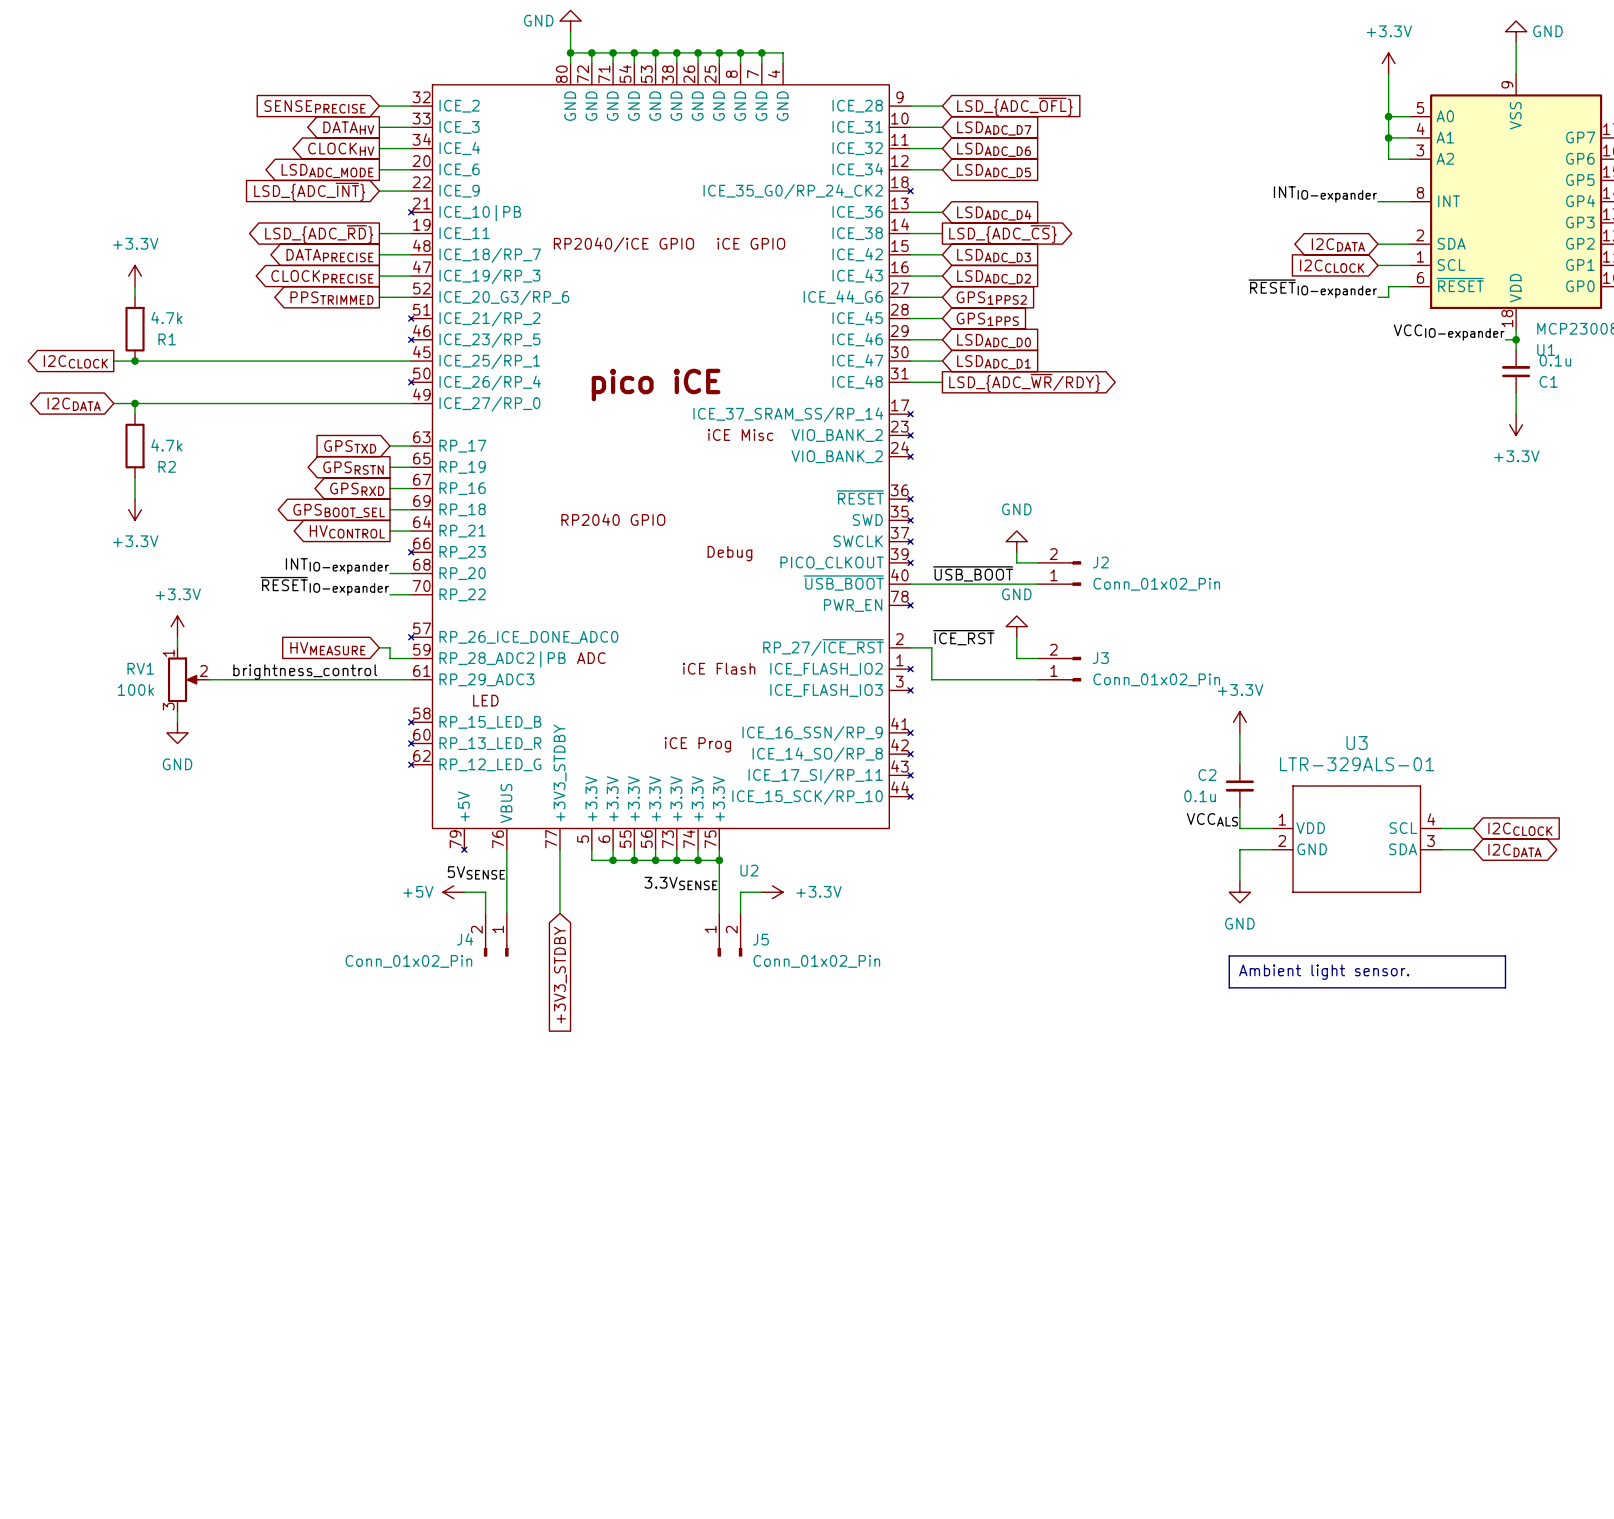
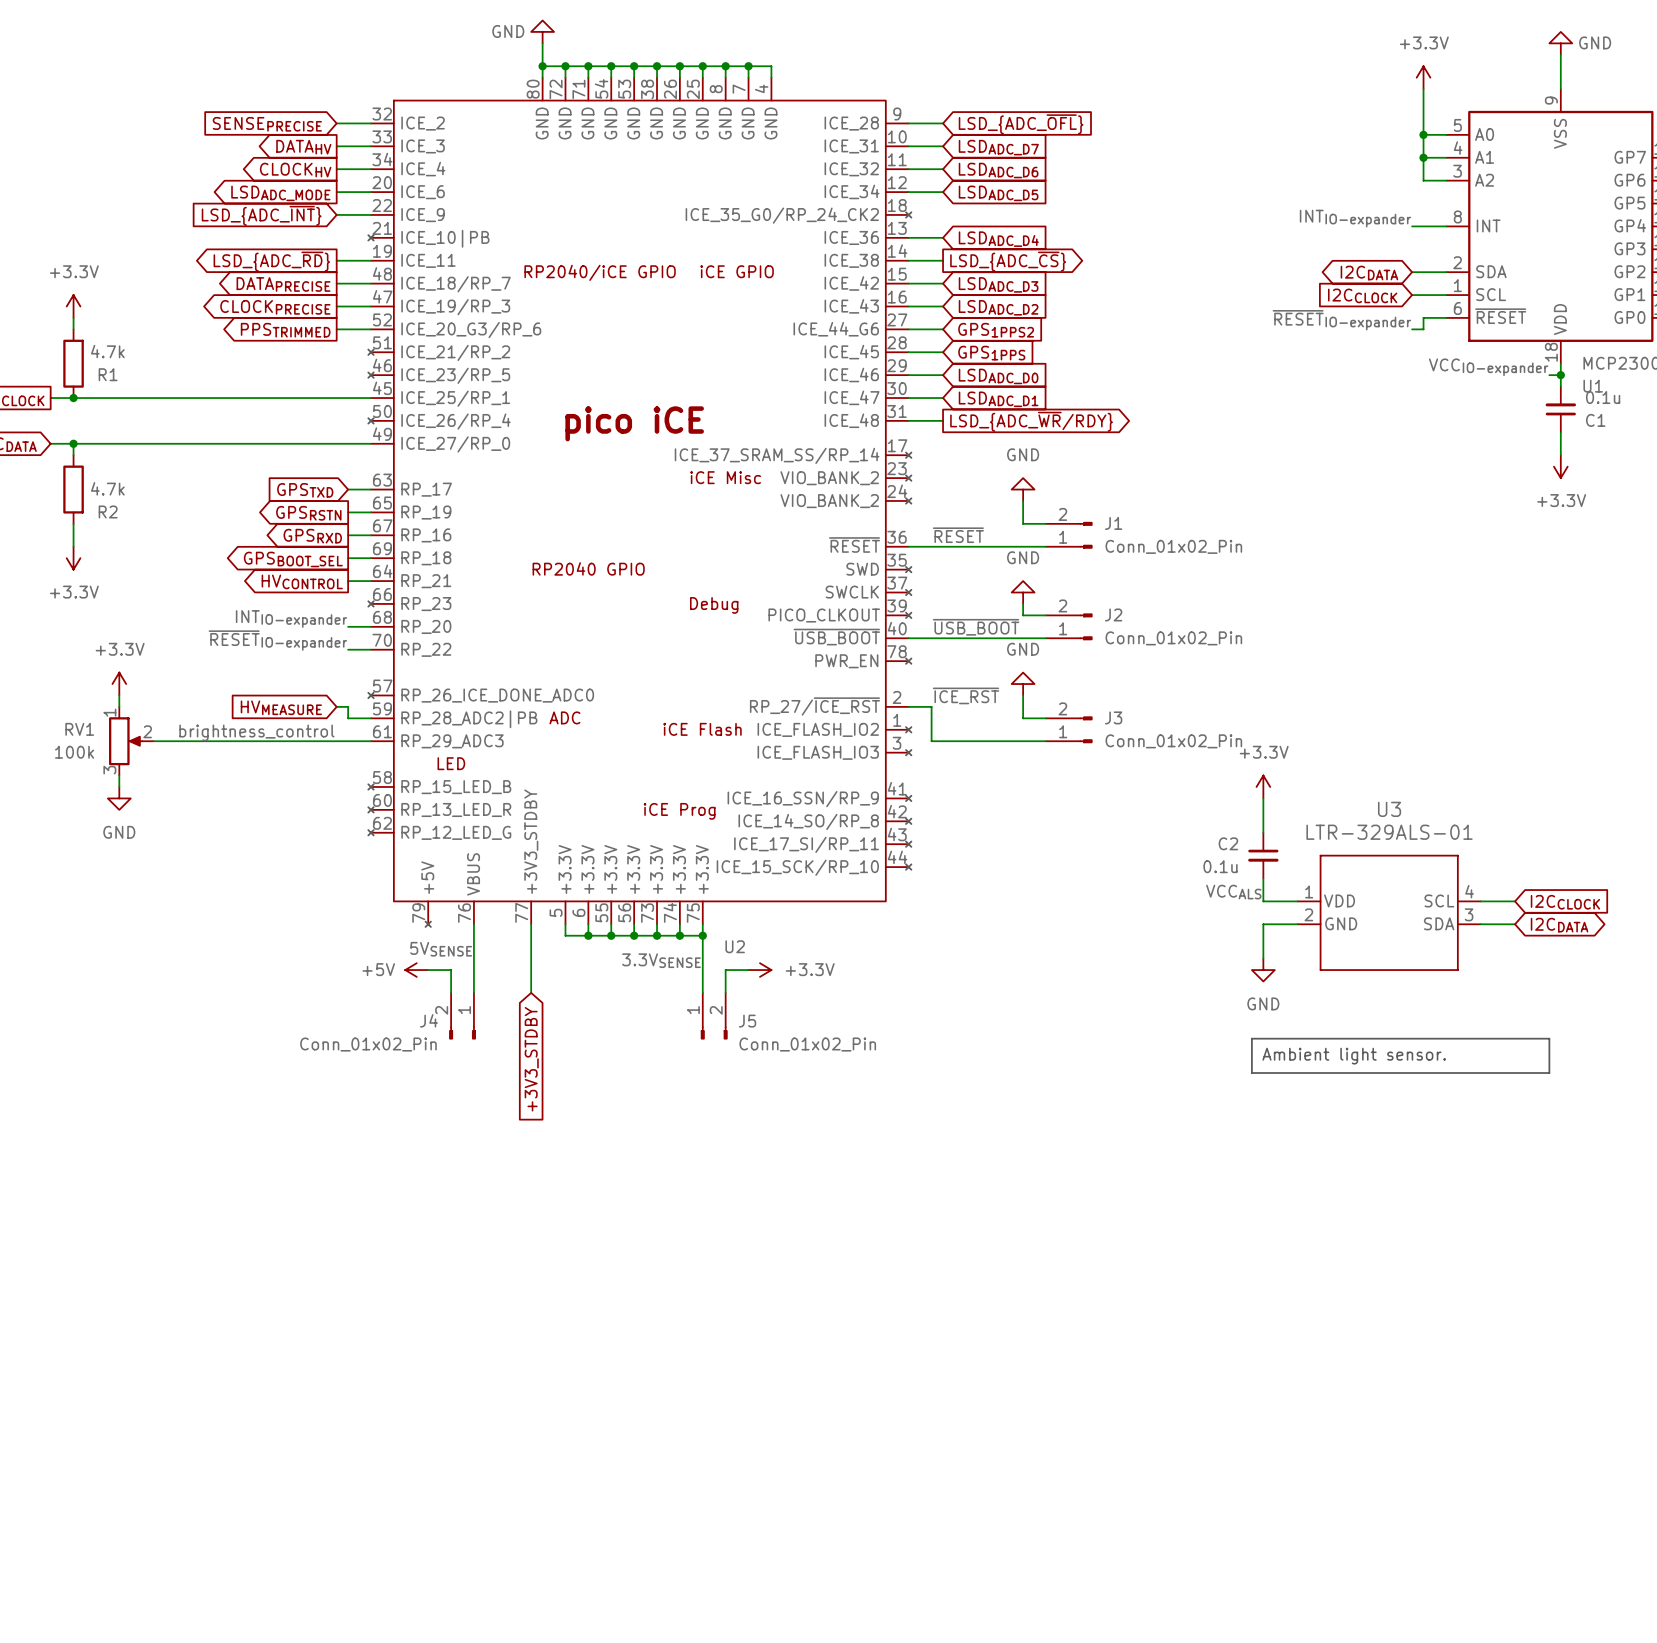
U2 symbol: [408, 63, 914, 853] -> [368, 77, 912, 927]
power symbol: none -> GND (1023, 489)
wire: none -> (1023, 500) (1023, 523) (1045, 523)
label: none -> ~{RESET} (958, 535)
J1: none -> Conn_01x02_Pin (1069, 535)
wire: none -> (908, 546) (1045, 546)

